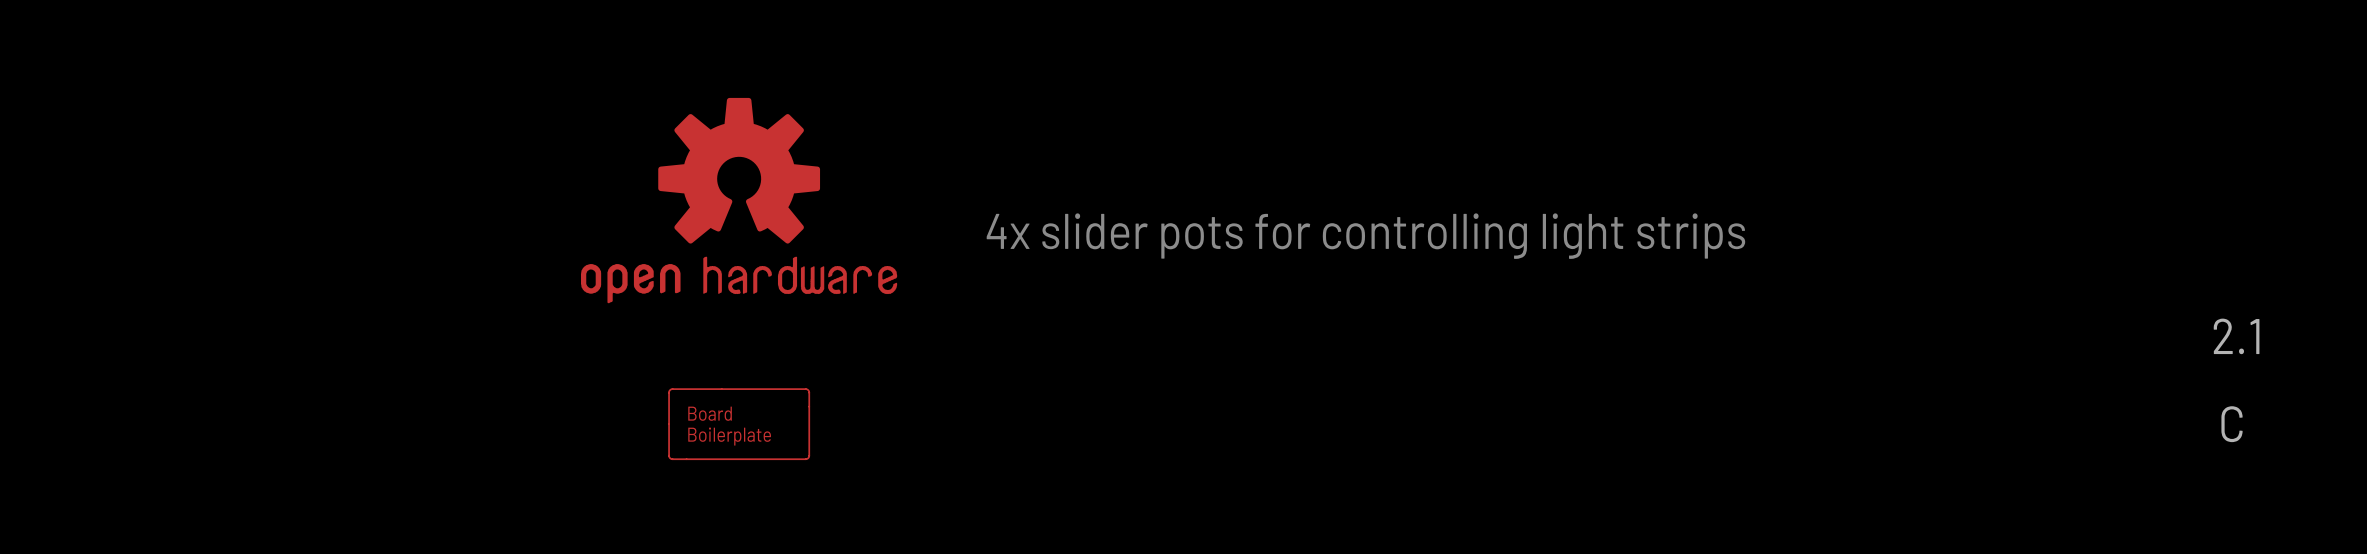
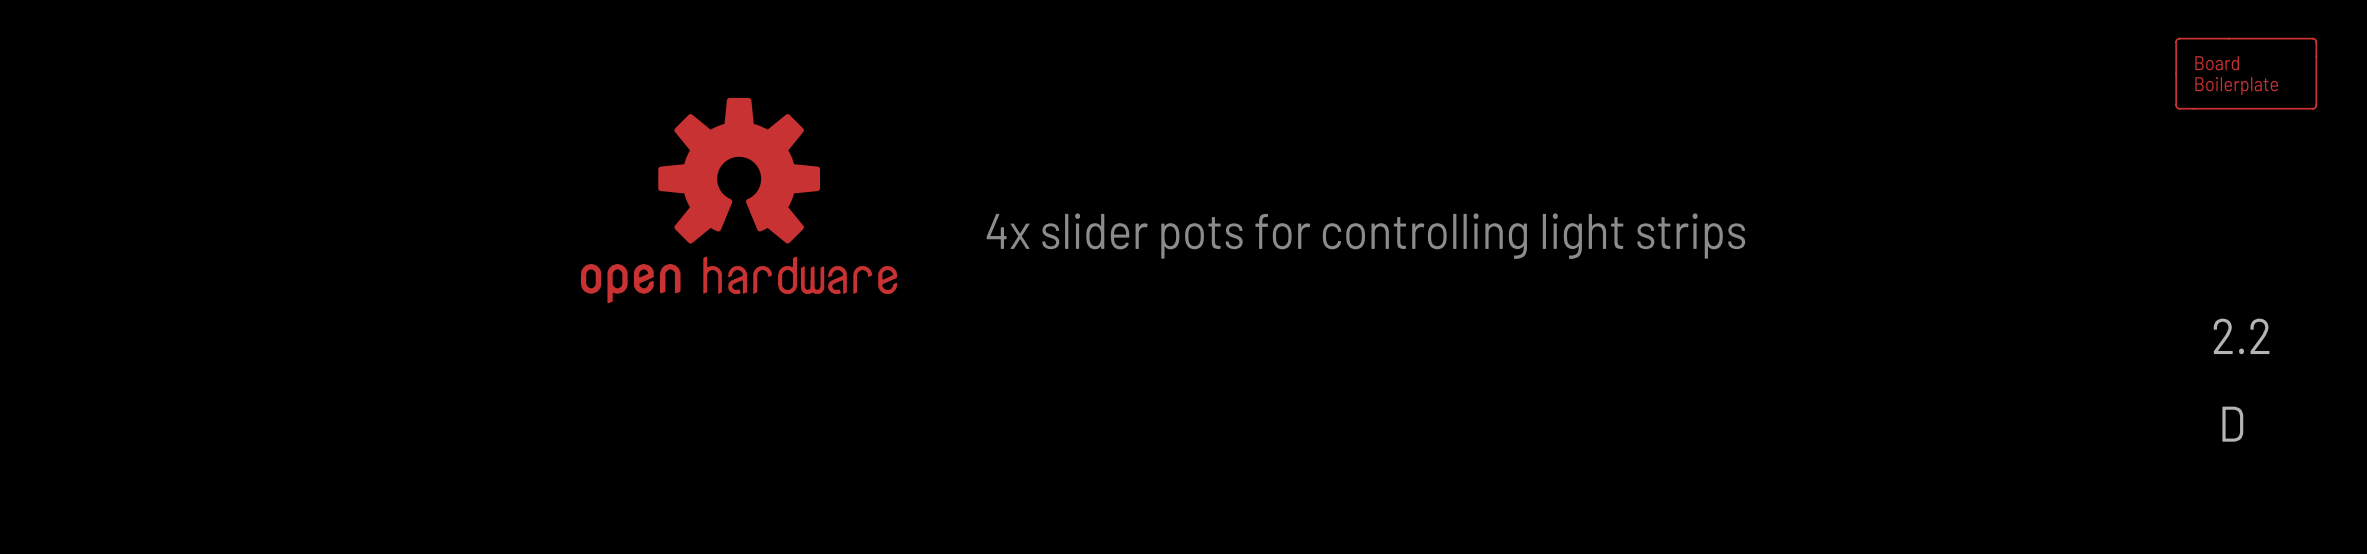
part: none -> (2246, 73)
text: 2.1 (2236, 336) -> 2.2 (2241, 336)
part: (739, 424) -> none
text: C (2232, 424) -> D (2232, 424)

